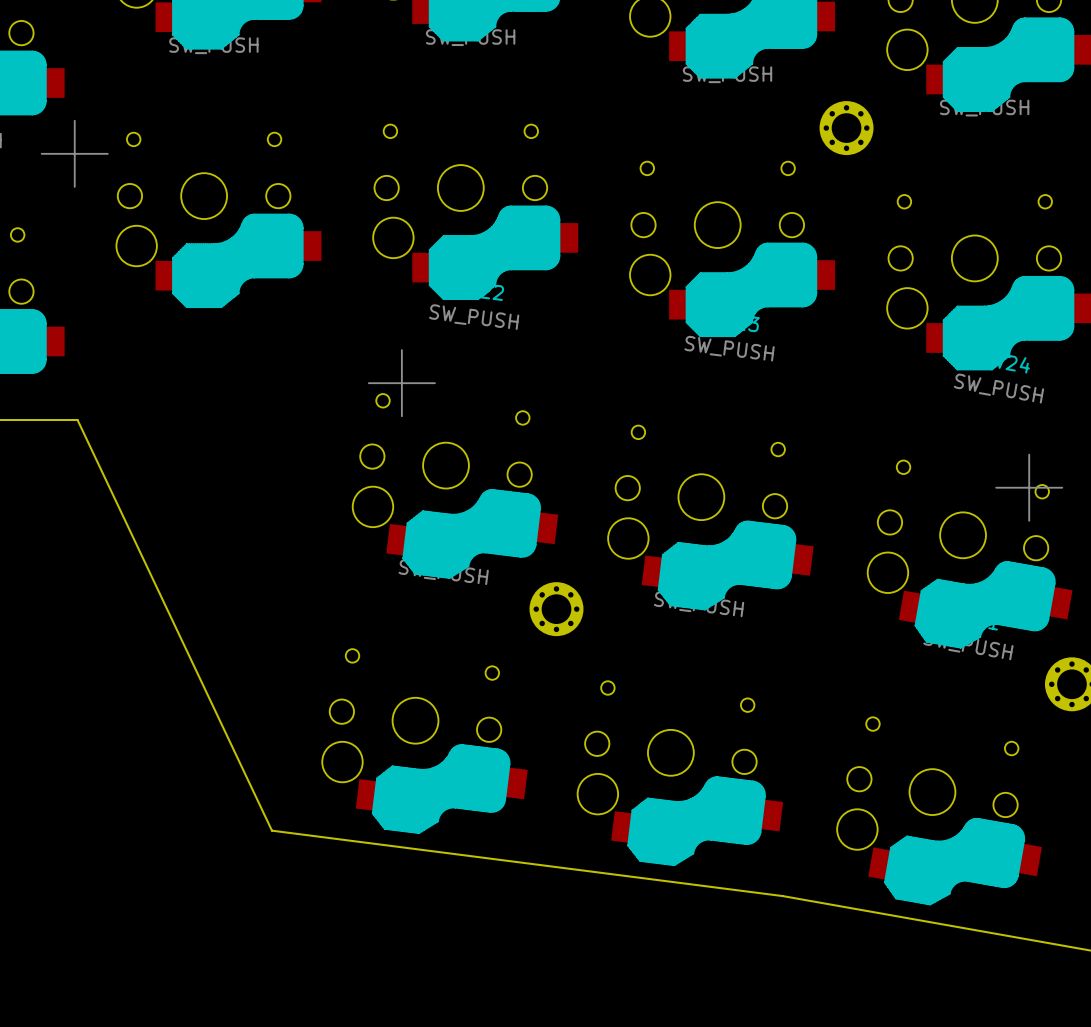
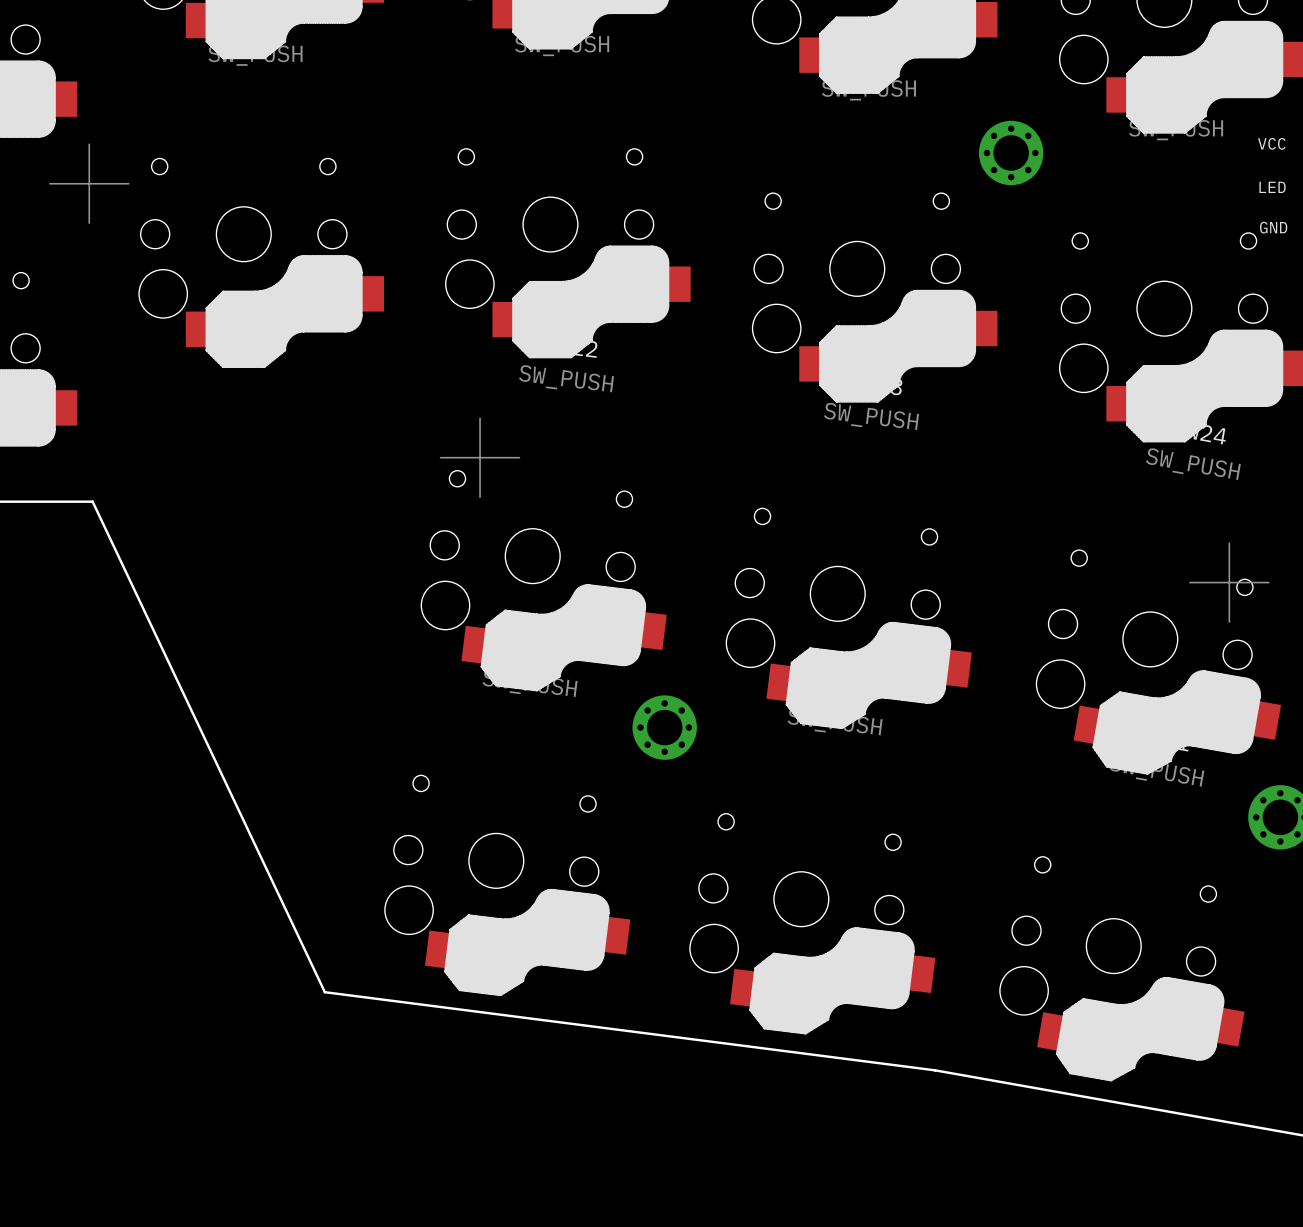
text: none -> VCC (1271, 143)
text: none -> LED (1272, 187)
text: none -> GND (1273, 227)

